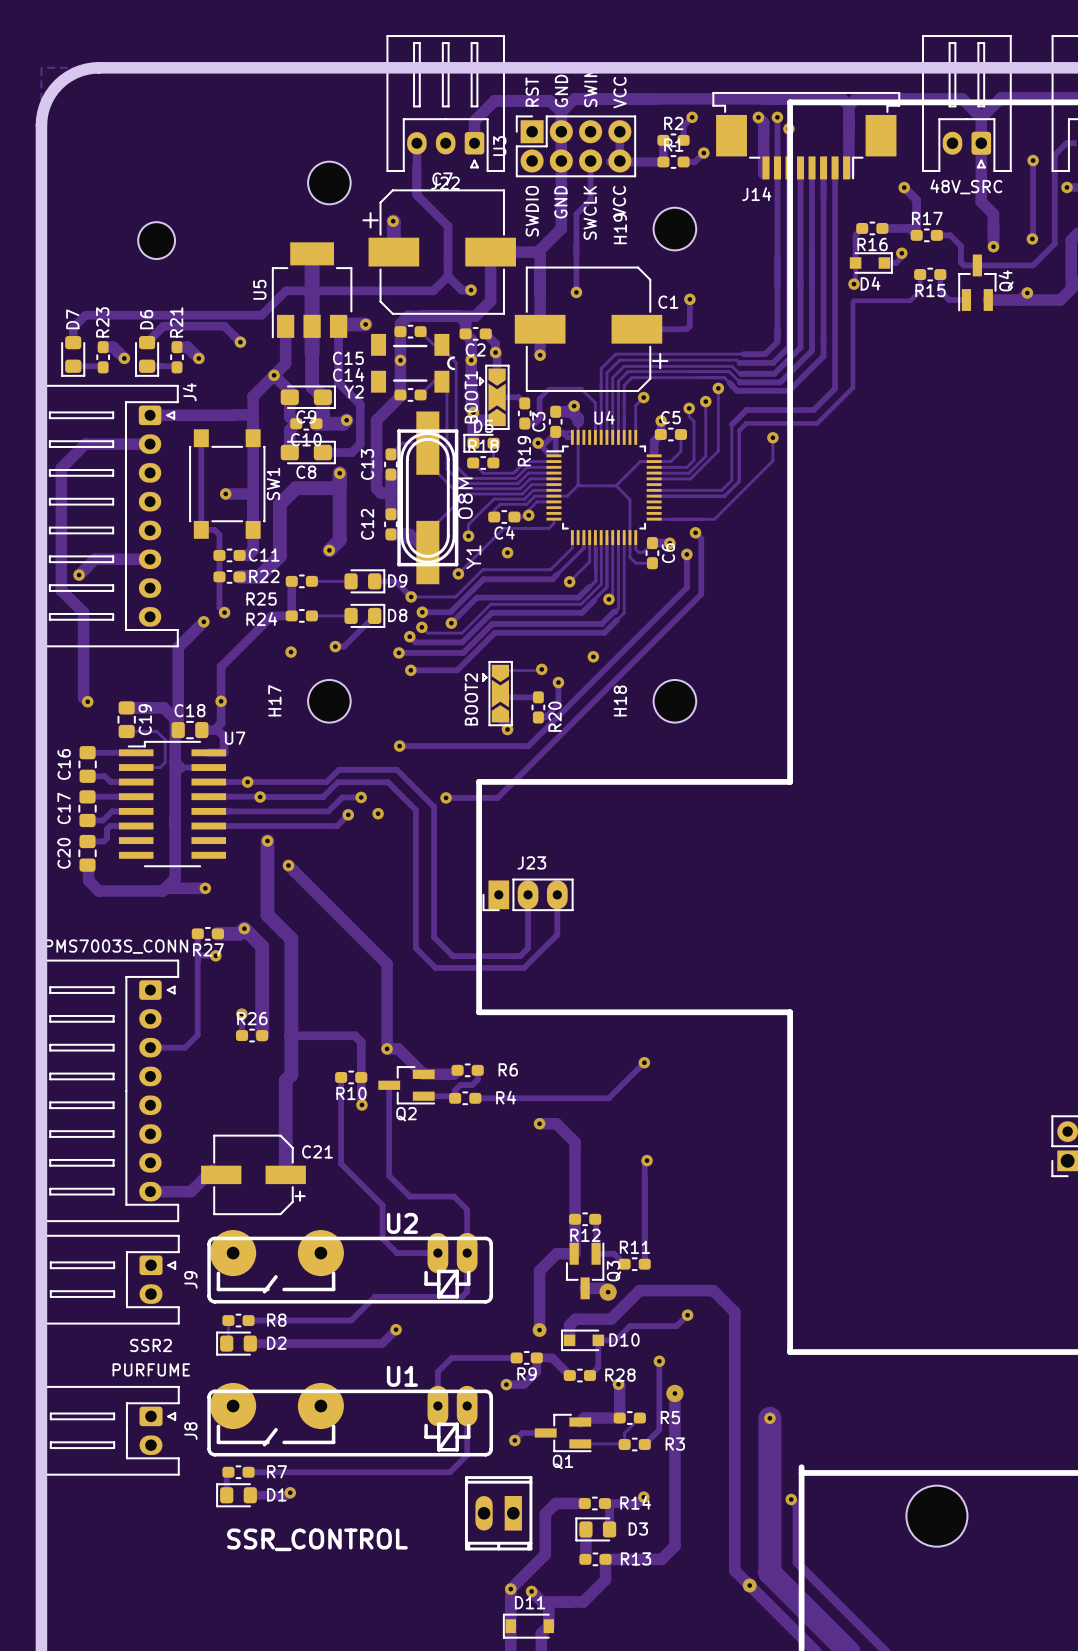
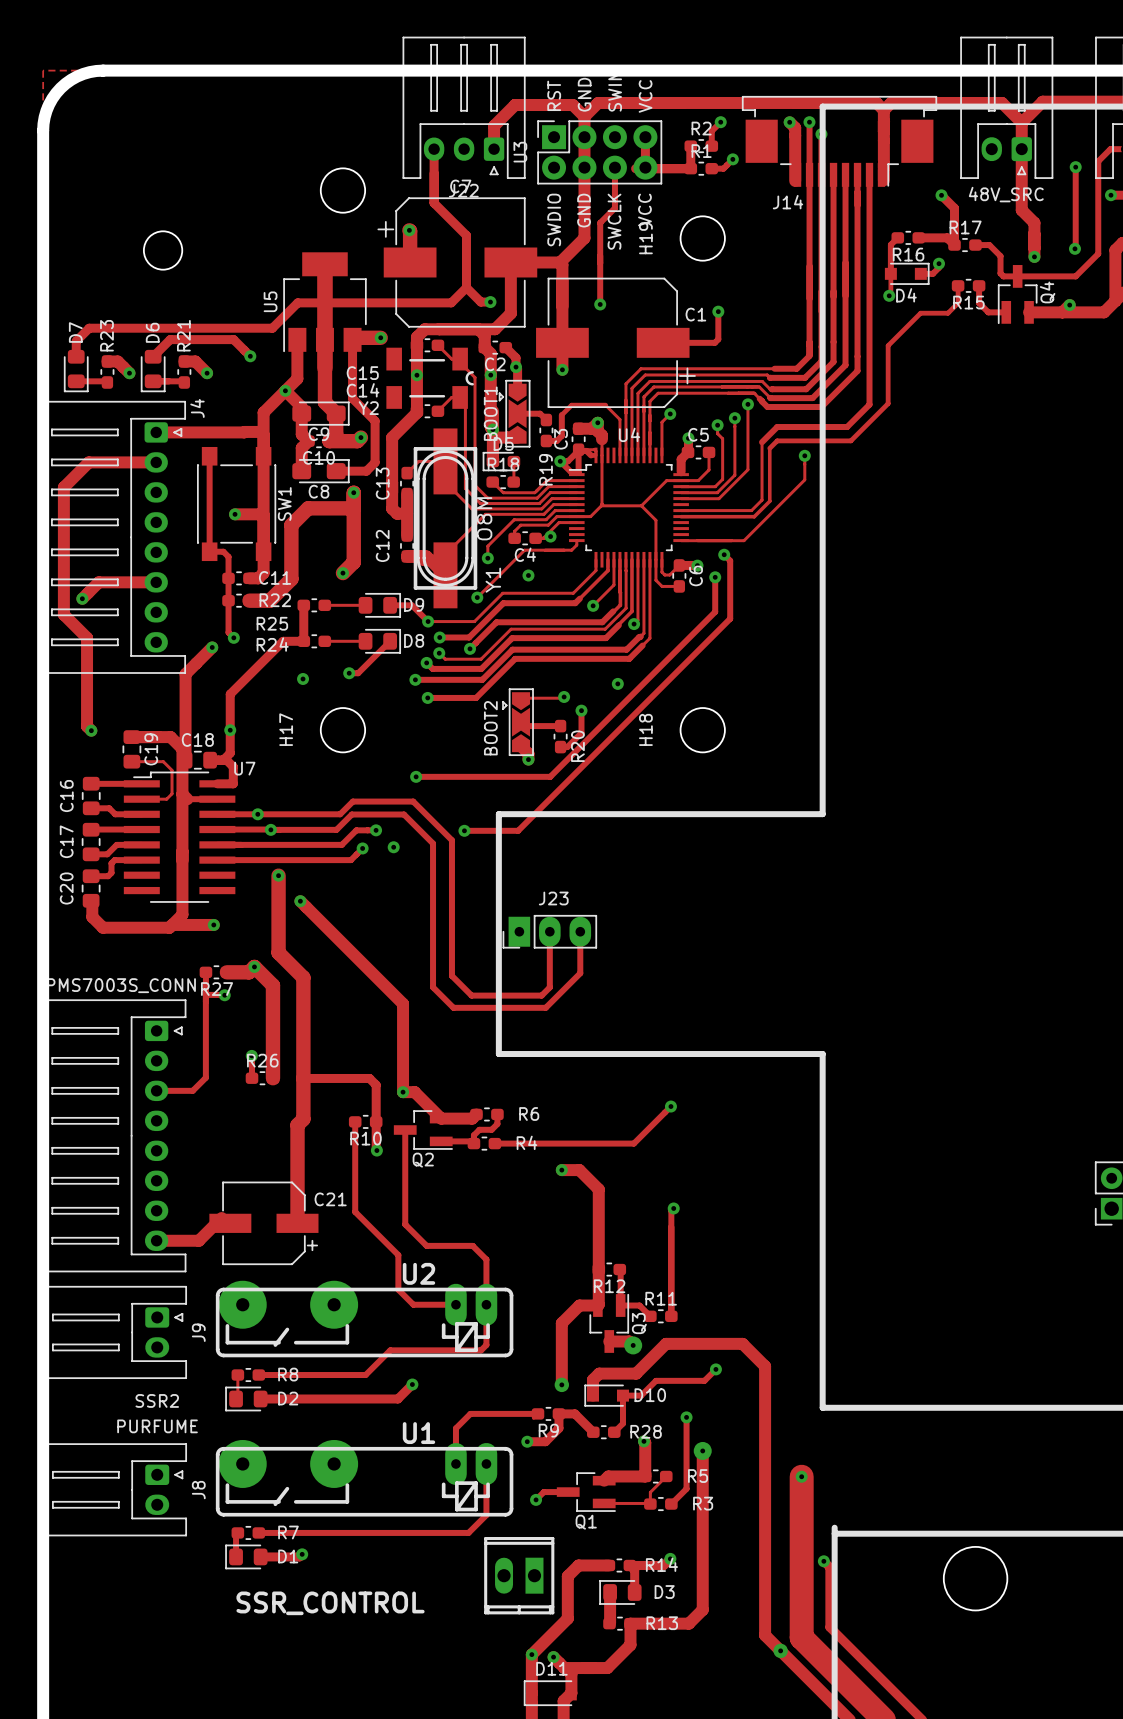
track: (884, 300) (852, 301) (852, 332) -> (920, 313) (888, 345)

